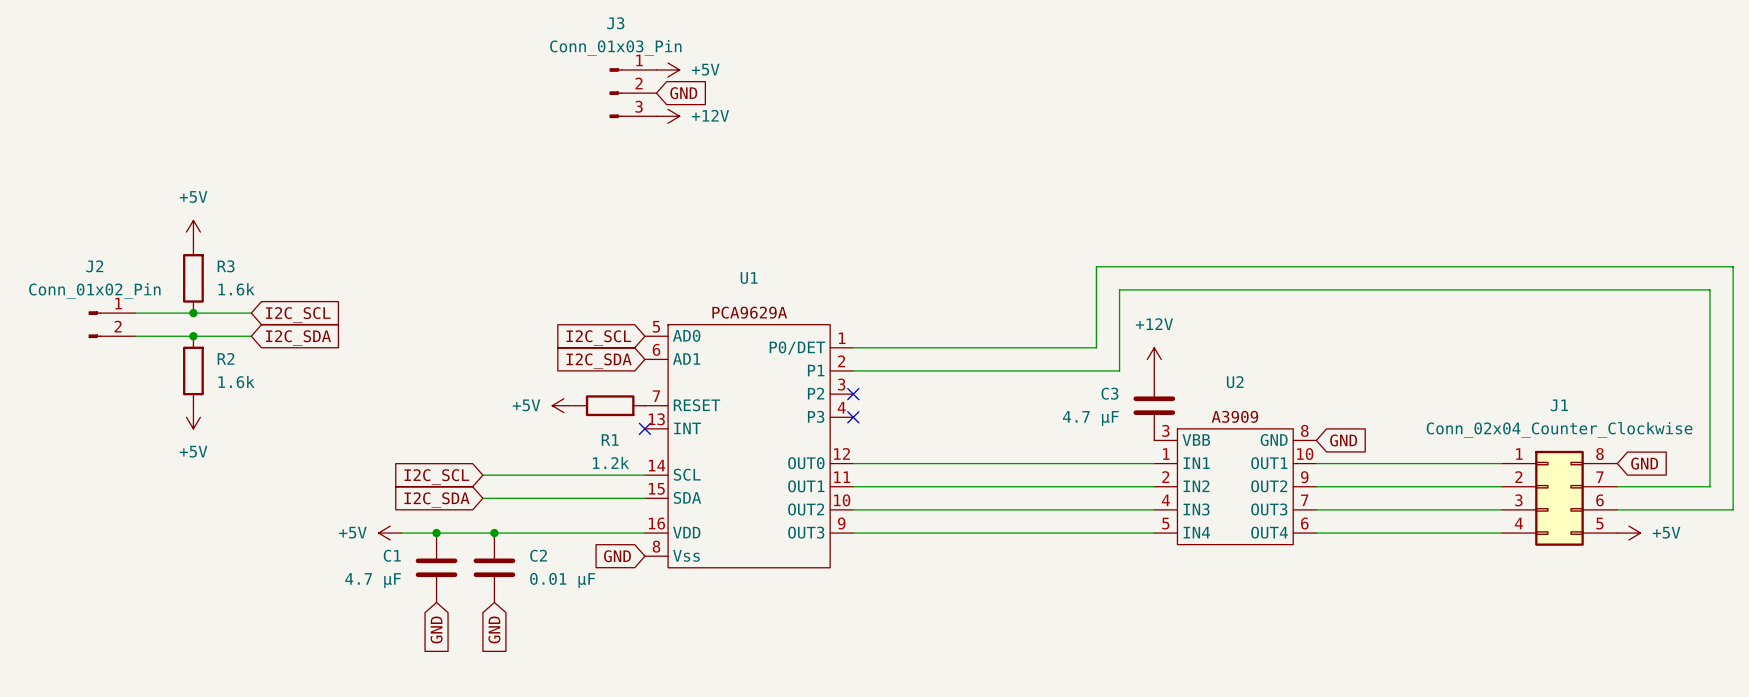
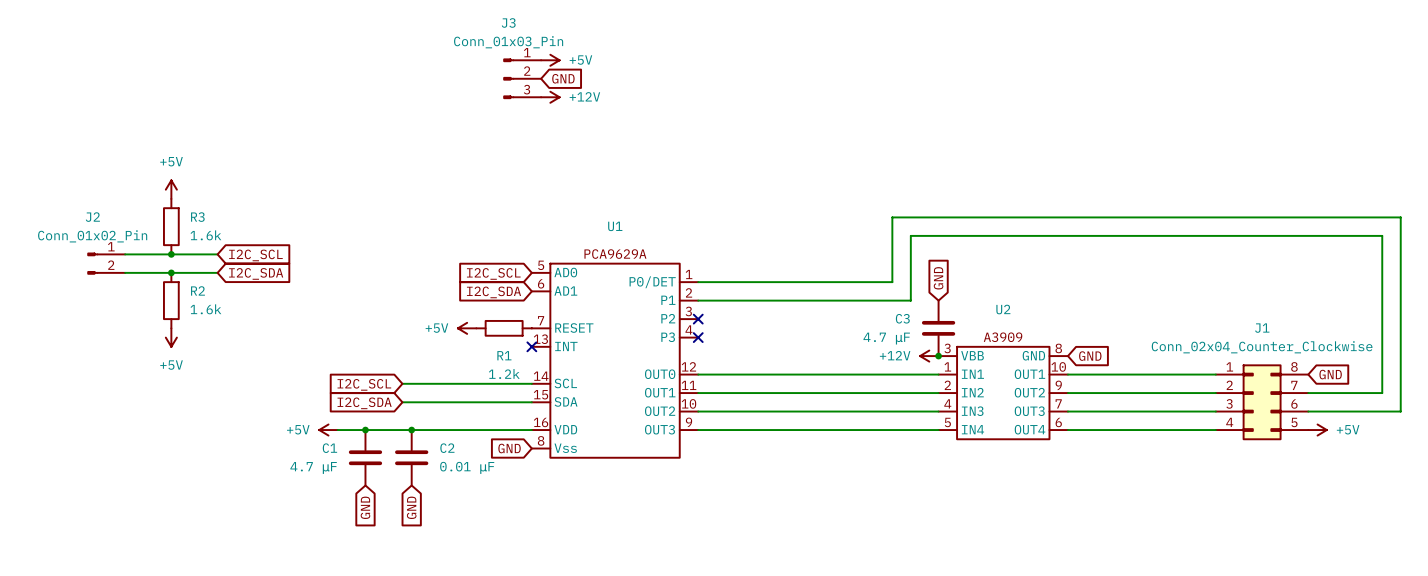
global label: none -> GND (938, 278)
power symbol rotation: 0° (1154, 359) -> 90° counterclockwise (929, 356)
power symbol position: +12V (1154, 359) -> +12V (929, 356)
junction: none -> (938, 356)

